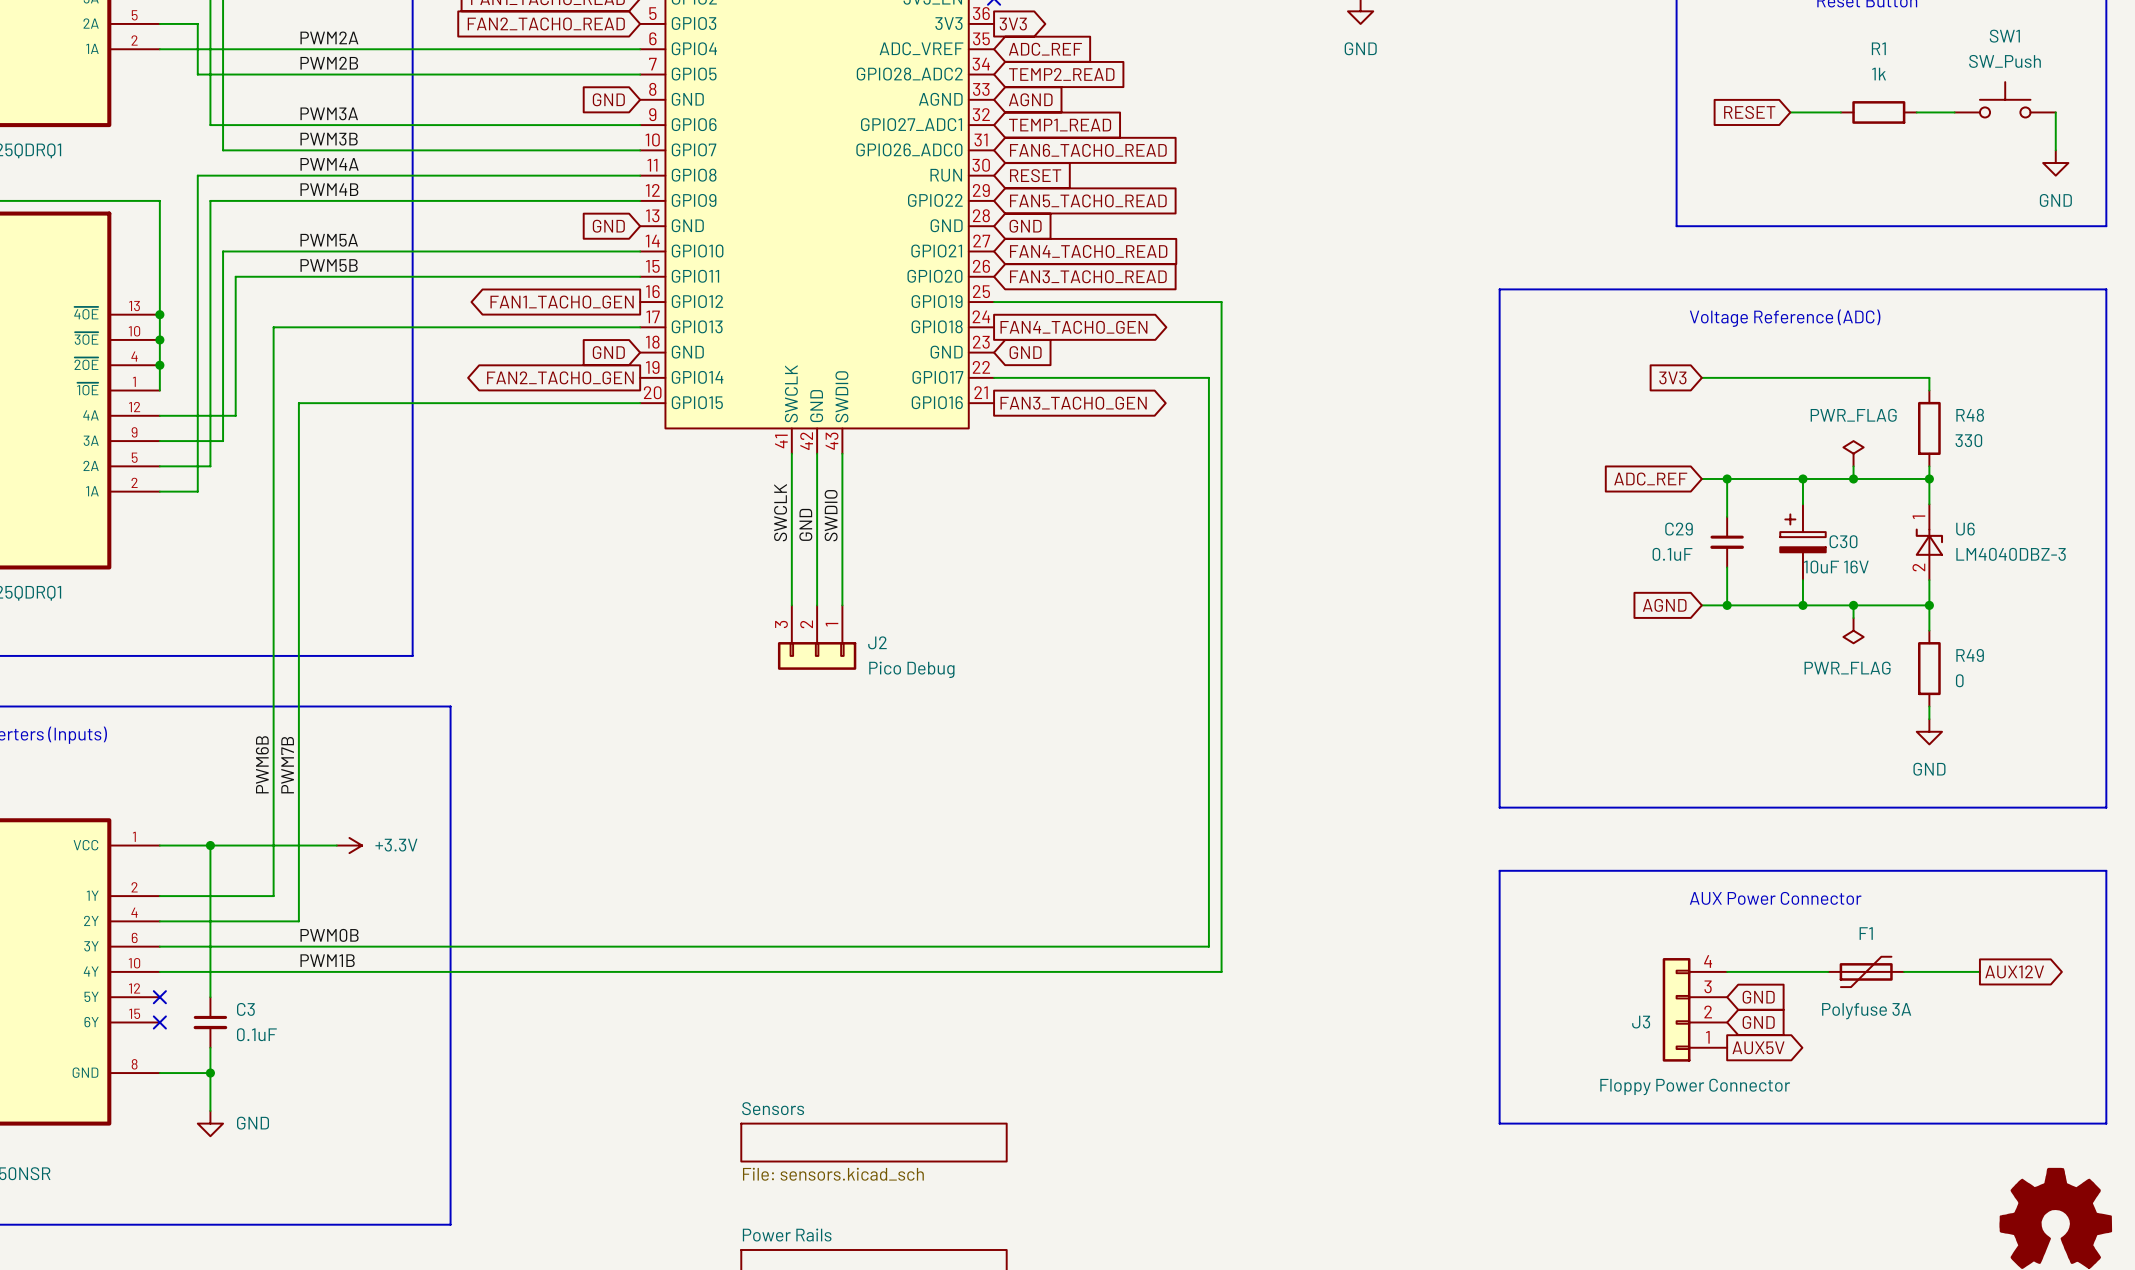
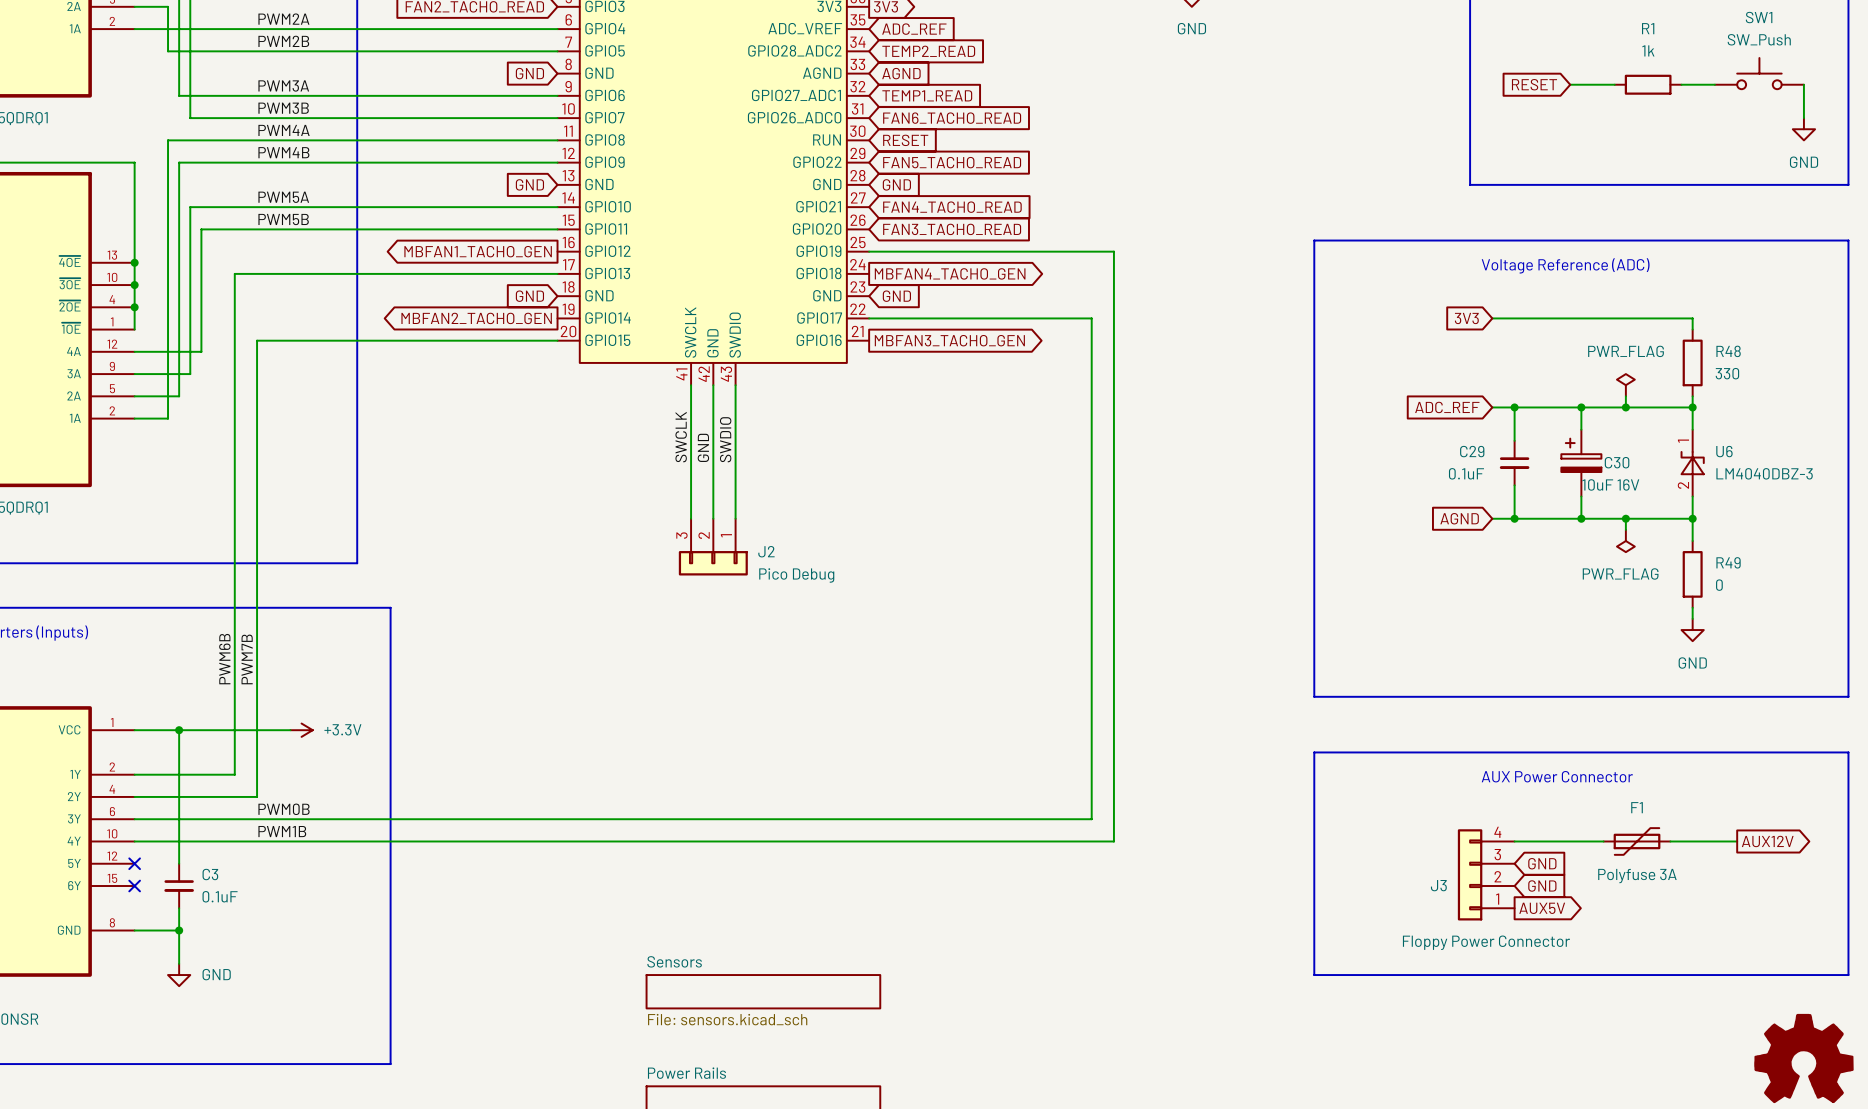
global label: FAN1_TACHO_GEN (562, 302) -> MBFAN1_TACHO_GEN (478, 251)
wire: (1221, 302) (1221, 971) -> (1069, 251) (1113, 251) (1113, 841) (1069, 841)
global label: FAN4_TACHO_GEN (1073, 327) -> MBFAN4_TACHO_GEN (950, 273)
global label: FAN2_TACHO_GEN (560, 377) -> MBFAN2_TACHO_GEN (476, 318)
wire: (1208, 377) (1208, 946) -> (1058, 318) (1091, 318) (1091, 819) (1058, 819)
global label: FAN3_TACHO_GEN (1073, 403) -> MBFAN3_TACHO_GEN (949, 340)

